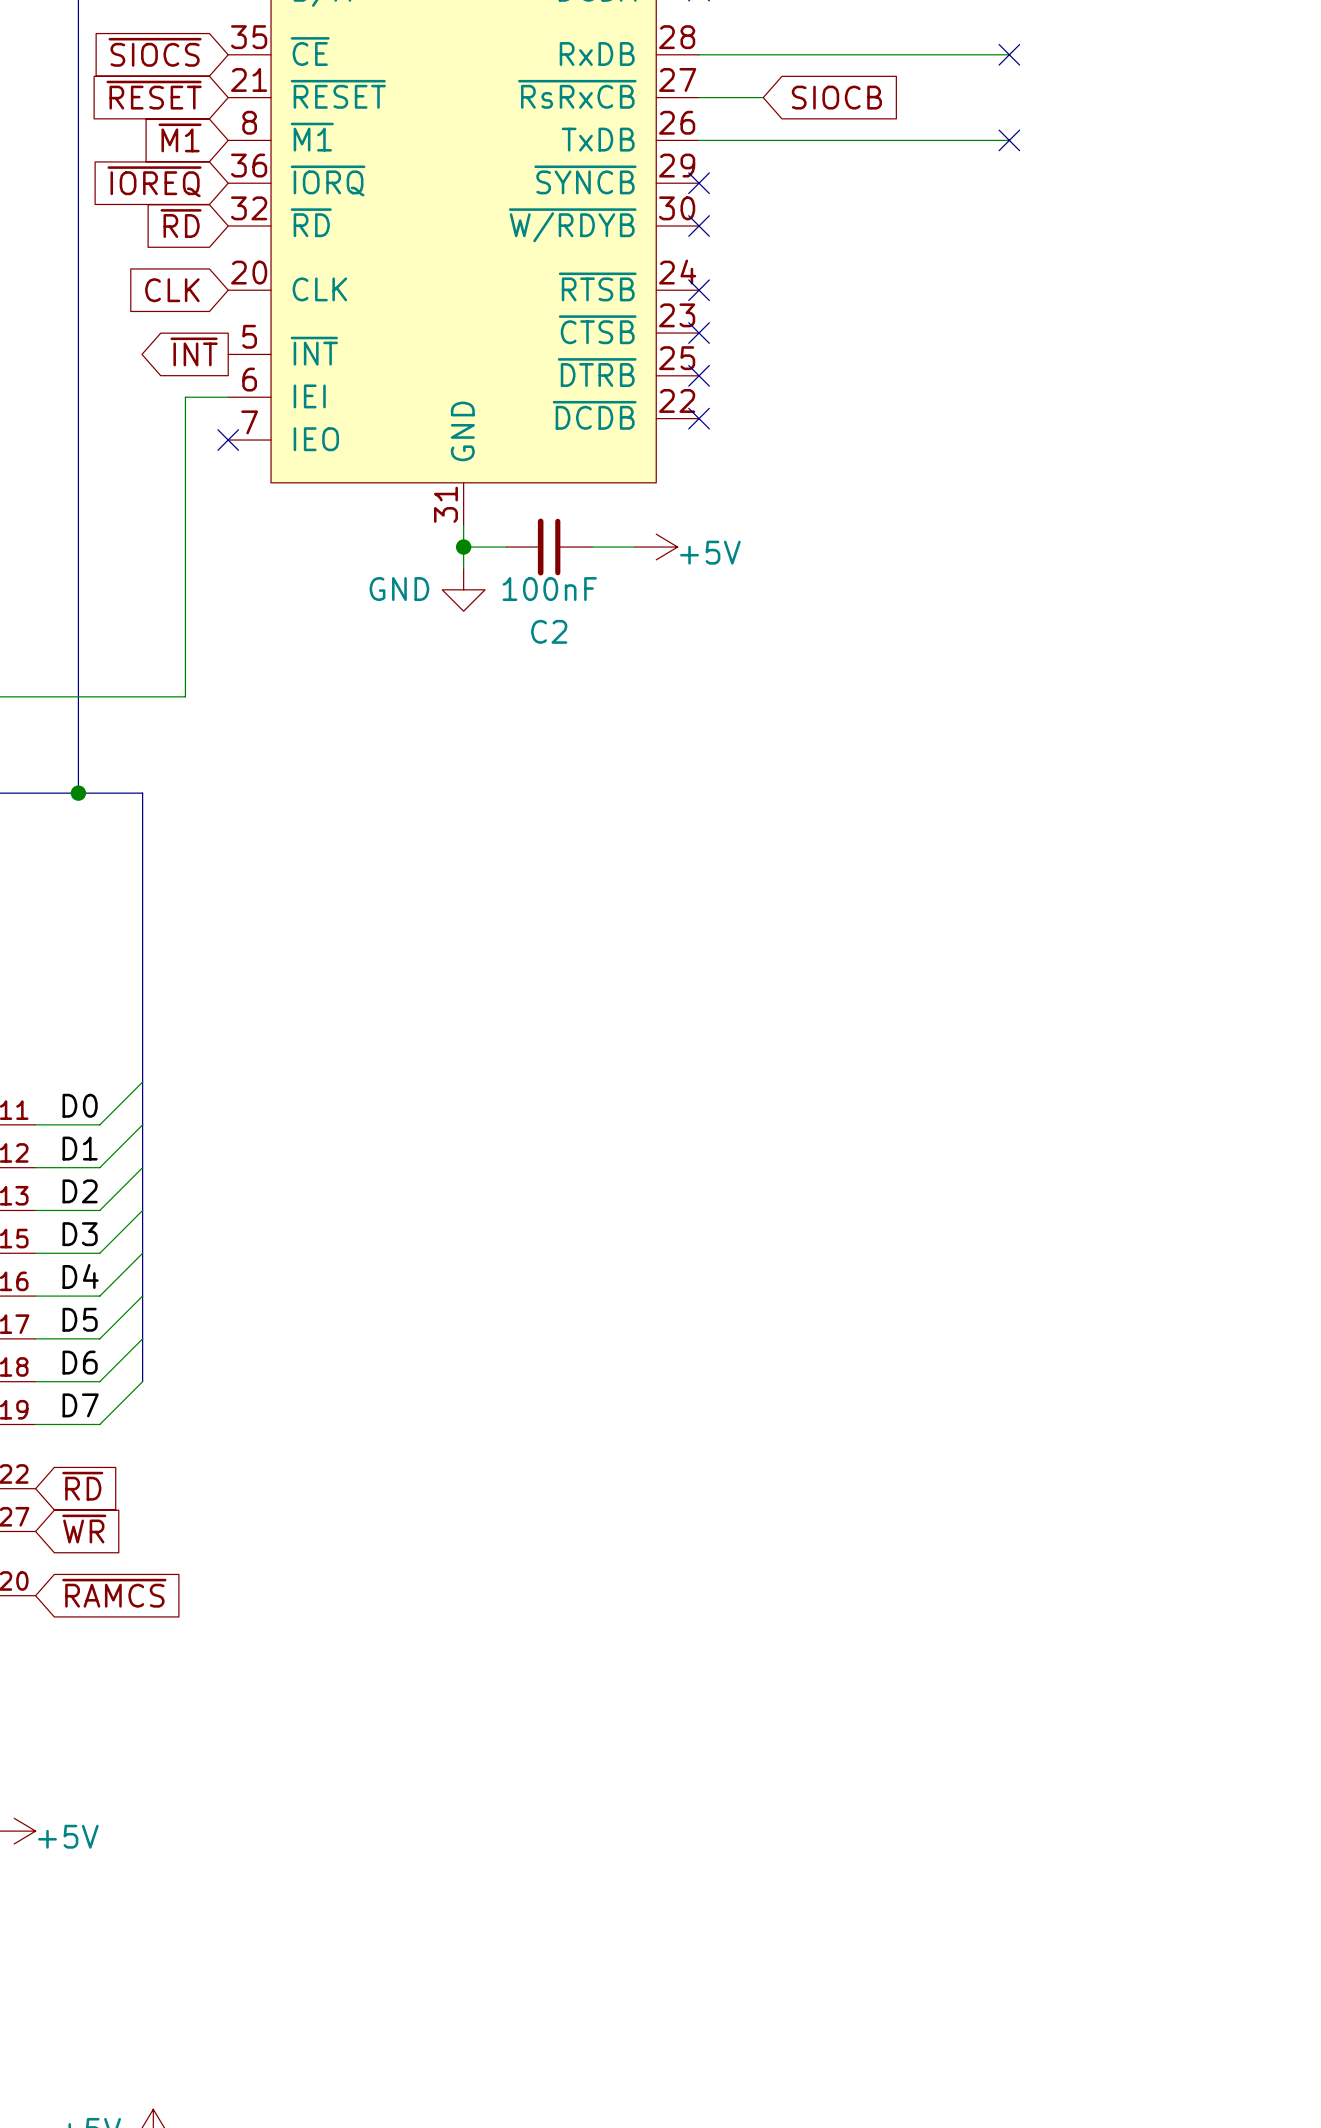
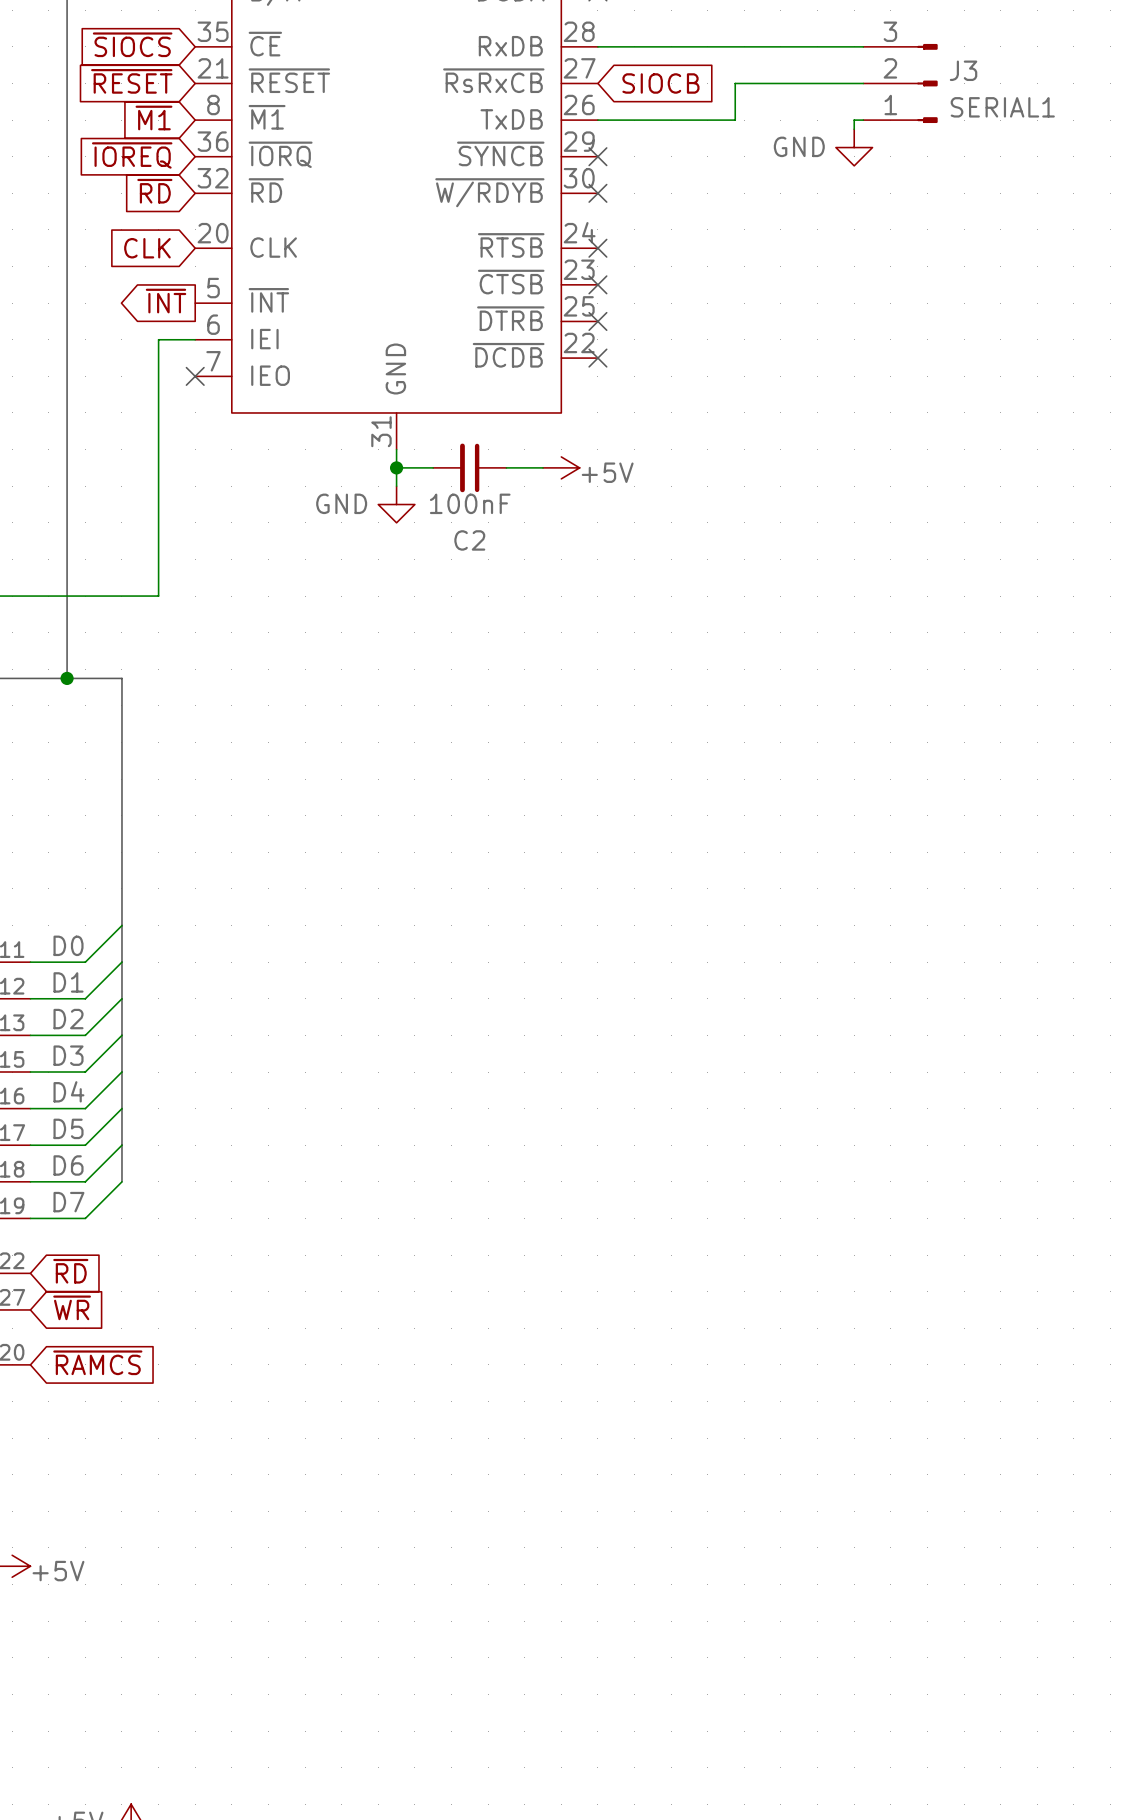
no-connect mark: (1009, 54) -> none
wire: (699, 97) (763, 97) -> none
global label position: SIOCB (836, 97) -> SIOCB (660, 83)
J3: none -> SERIAL1 (900, 83)
wire: (859, 140) (998, 140) -> (735, 120) (735, 83) (863, 83)
wire: none -> (854, 120) (854, 129)
no-connect mark: (1009, 140) -> none
power symbol: none -> GND (854, 147)

